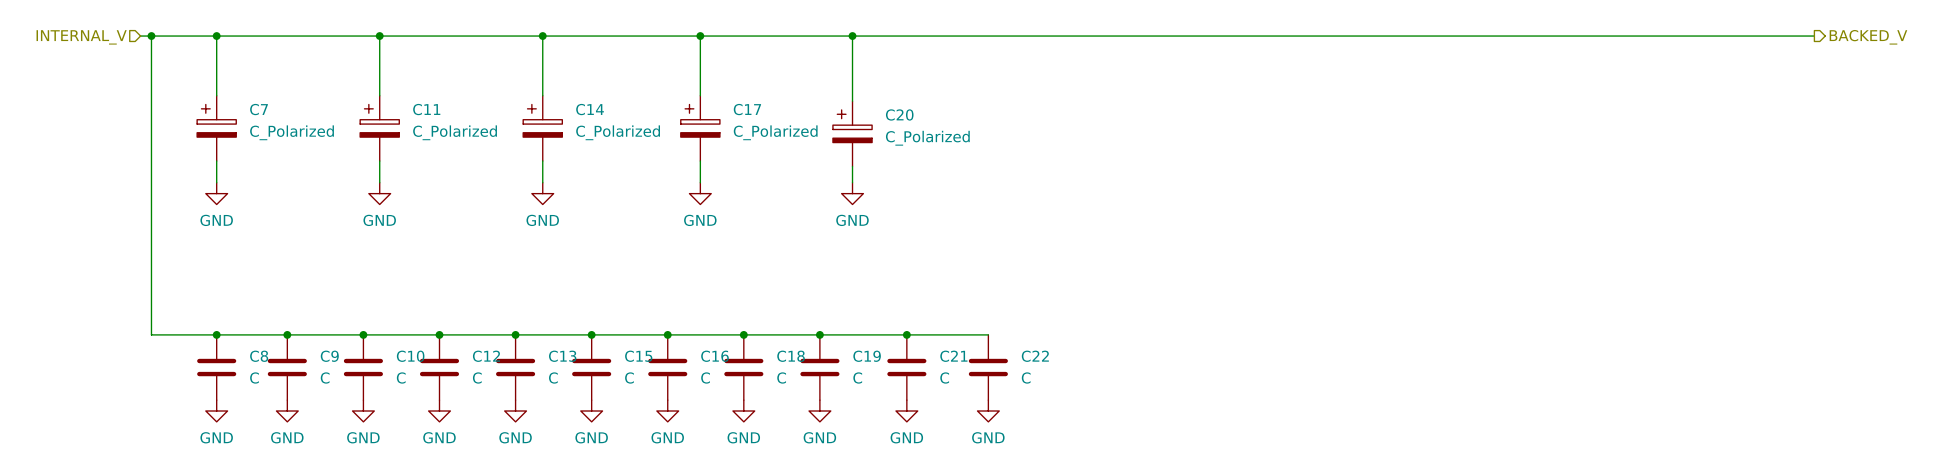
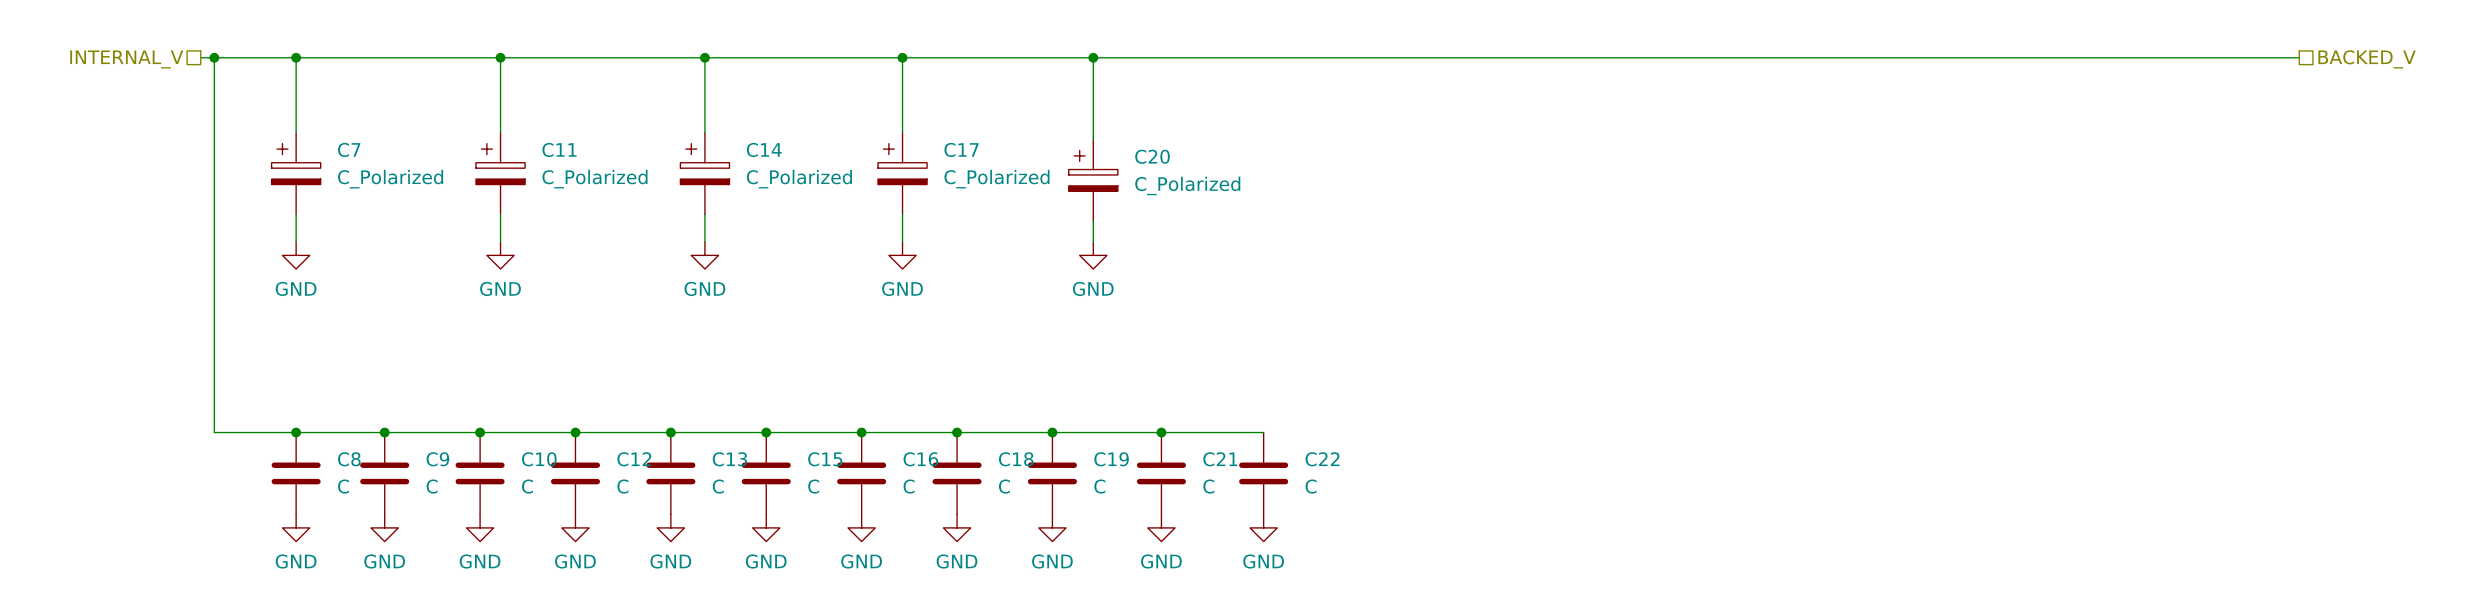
hierarchical label shape: input (81, 37) -> passive (126, 59)
hierarchical label shape: output (1868, 37) -> passive (2367, 59)

